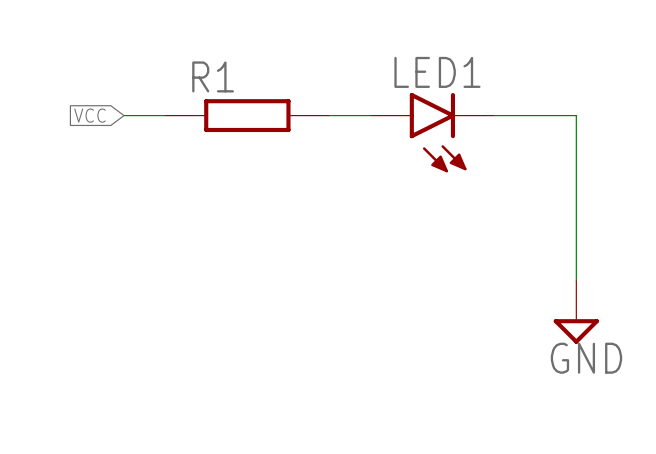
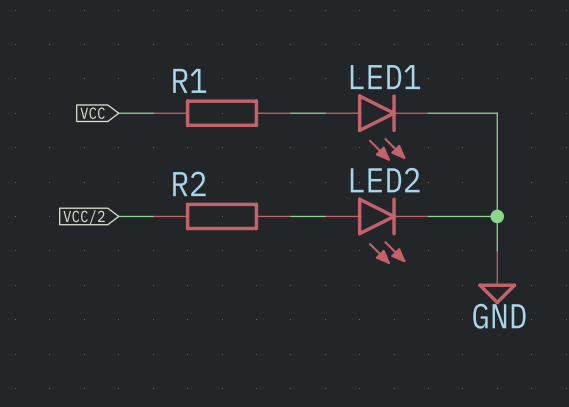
wire: none -> (118, 216) (153, 216)
R2: none -> (222, 216)
wire: none -> (290, 216) (325, 216)
wire: none -> (428, 216) (497, 216)
junction: none -> (497, 216)
global label: none -> VCC/2 (84, 217)
LED2: none -> (376, 230)

